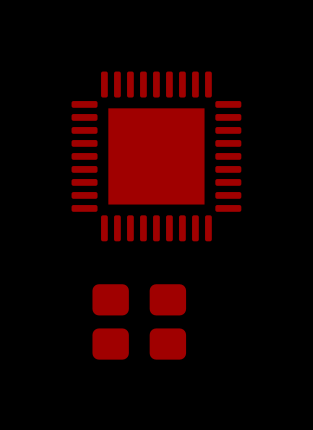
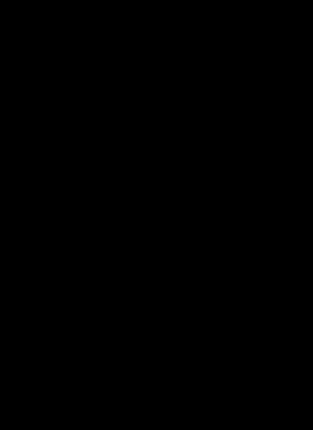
part: (156, 156) -> none
part: (139, 321) -> none

